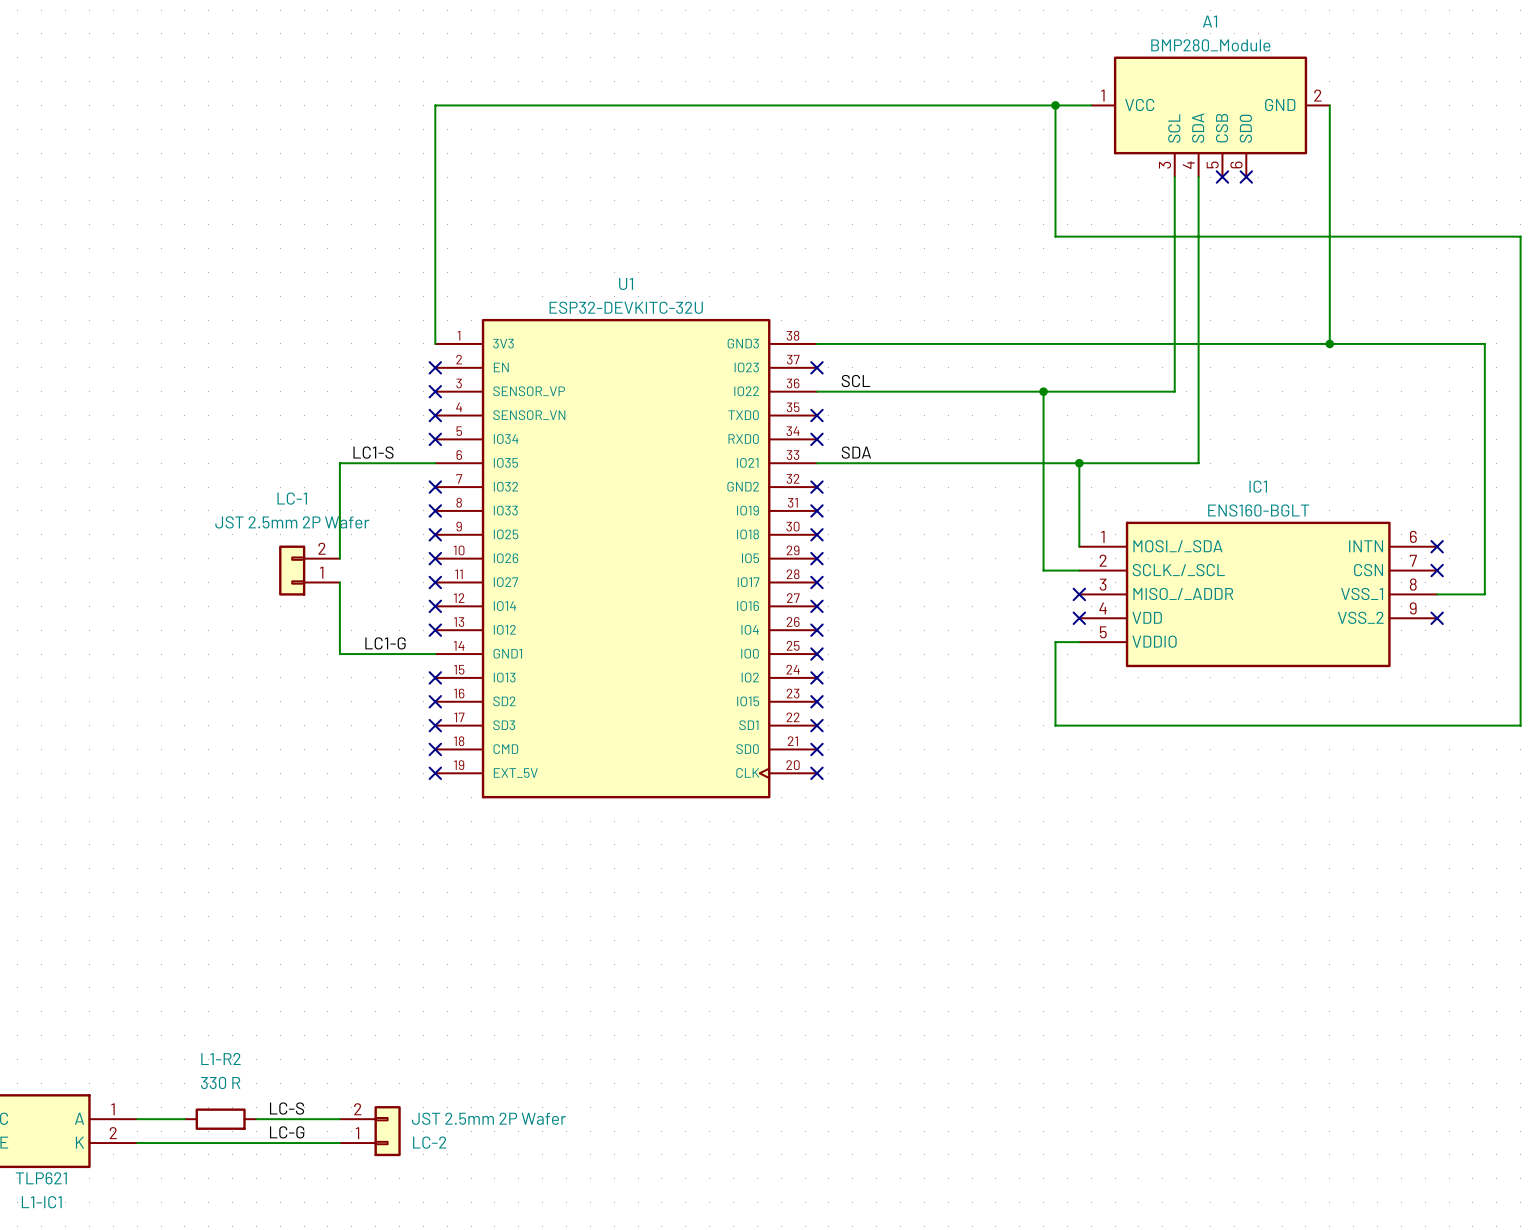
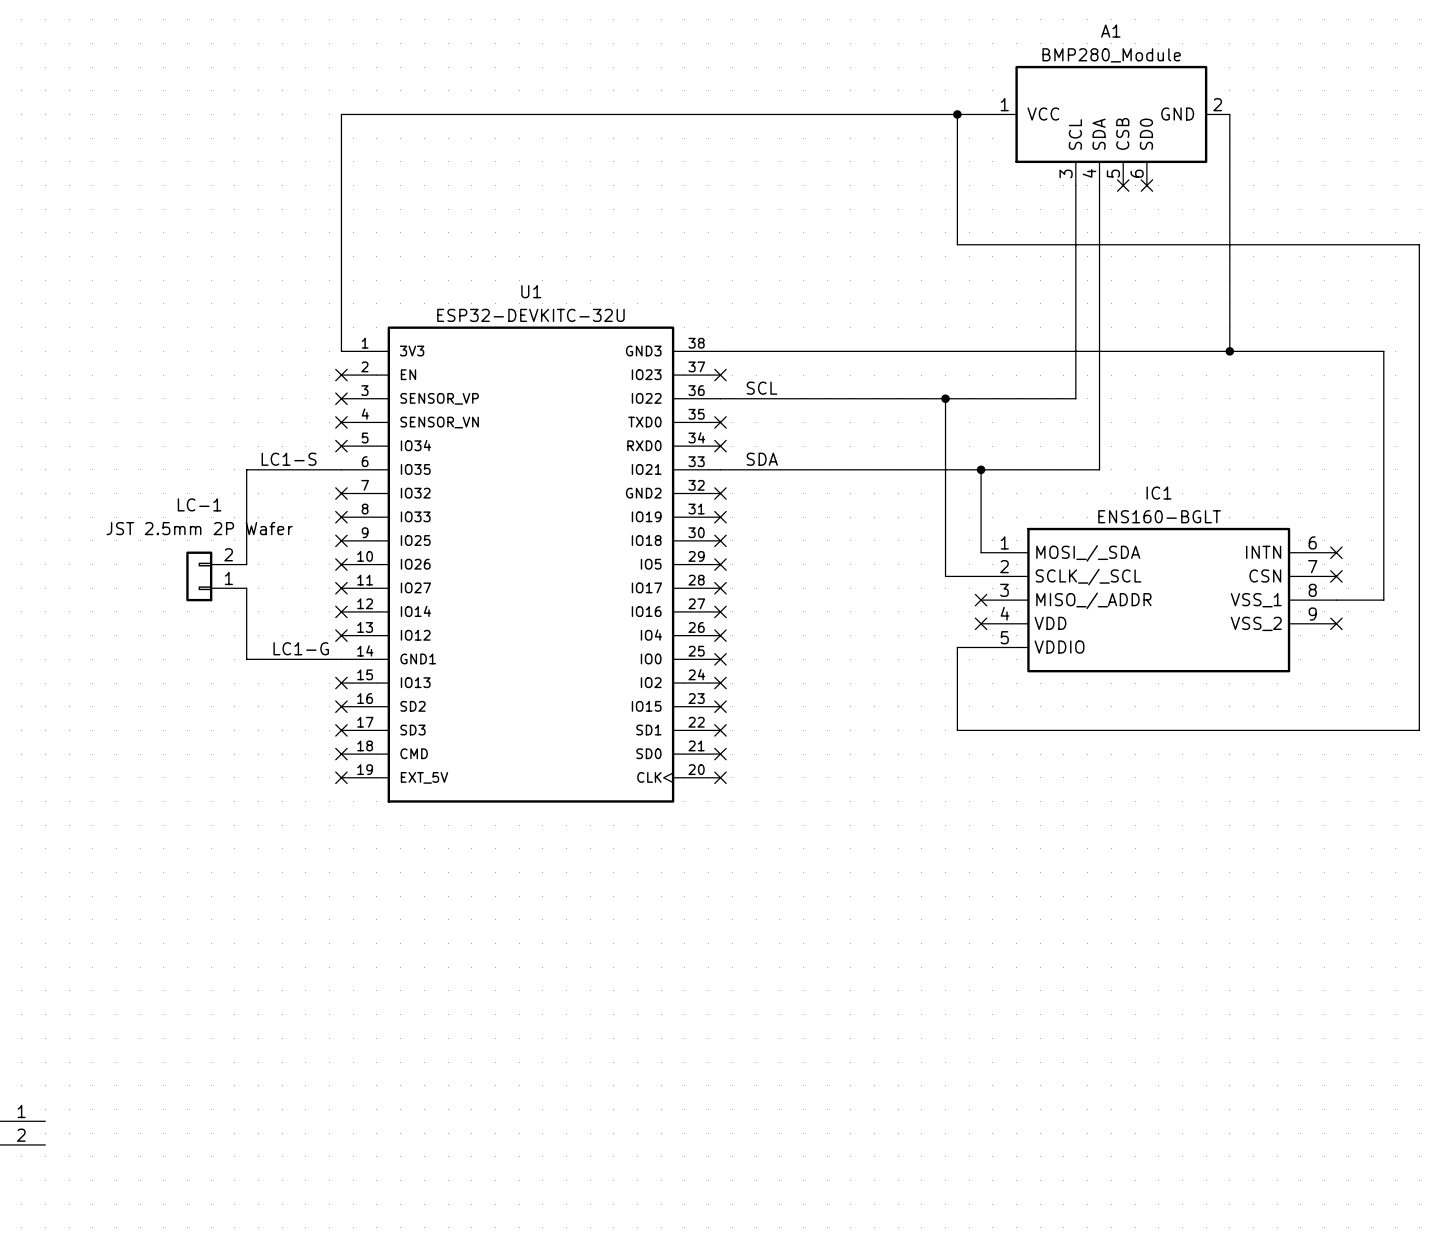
label: LC-S (287, 1108) -> none
wire: (137, 1119) (184, 1119) -> none
L1-R2: 330 R (220, 1119) -> none
wire: (256, 1119) (339, 1119) -> none
LC-2: JST 2.5mm 2P Wafer (370, 1131) -> none
label: LC-G (287, 1132) -> none
wire: (137, 1143) (339, 1143) -> none

